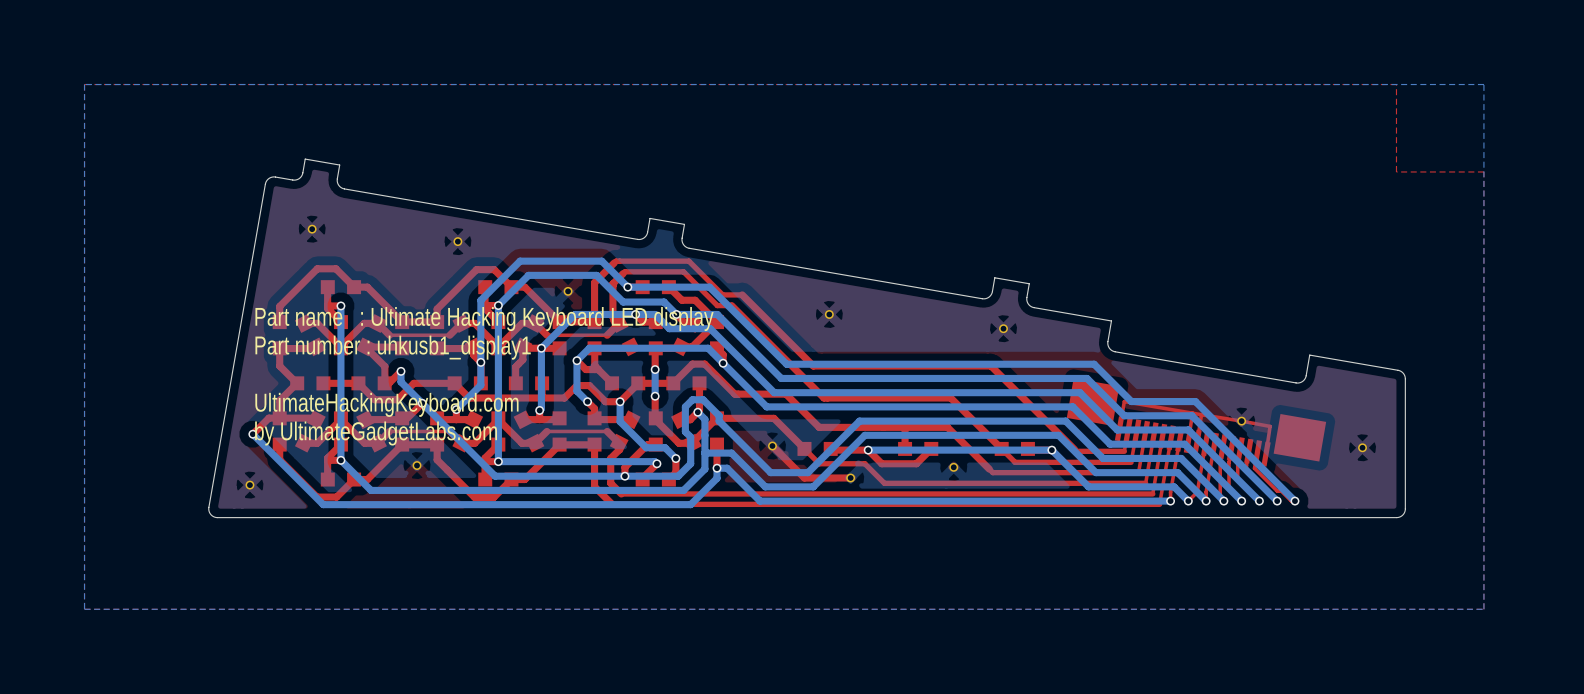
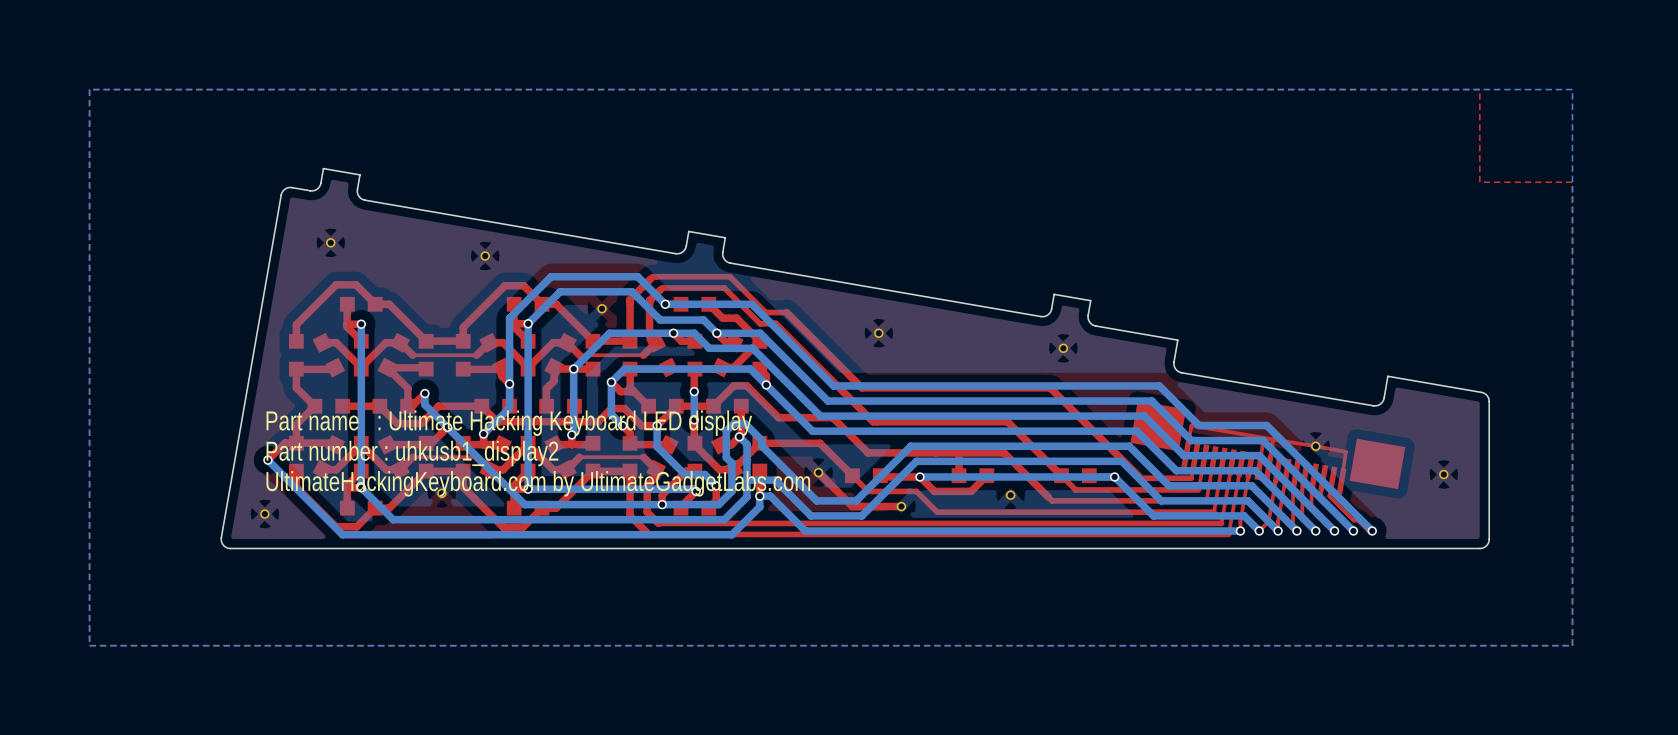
text position: Part name : Ultimate Hacking Keyboard LED display (484, 319) -> Part name : Ultimate Hacking Keyboard LED display (509, 423)
text: Part number : uhkusb1_display1 (393, 347) -> none
text: UltimateHackingKeyboard.com (386, 404) -> none
text: by UltimateGadgetLabs.com (376, 433) -> Part number : uhkusb1_display2 (412, 453)
text: none -> UltimateHackingKeyboard.com by UltimateGadgetLabs.com (538, 483)

